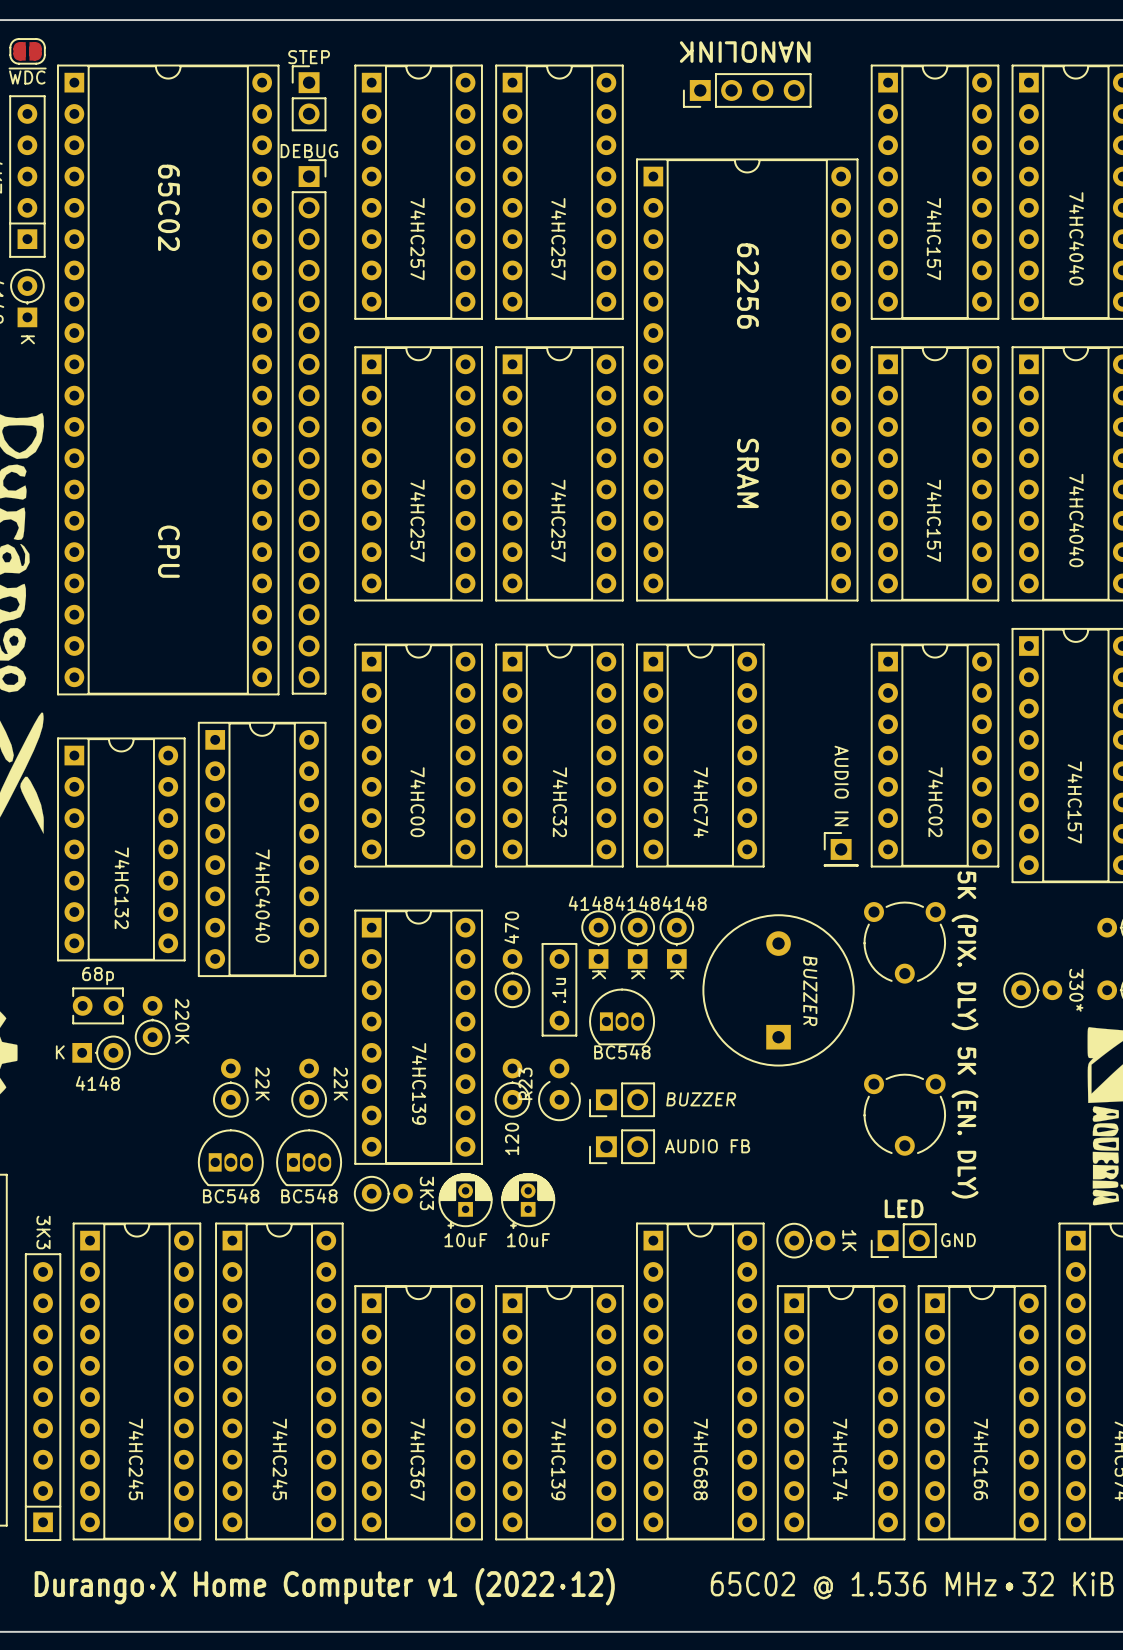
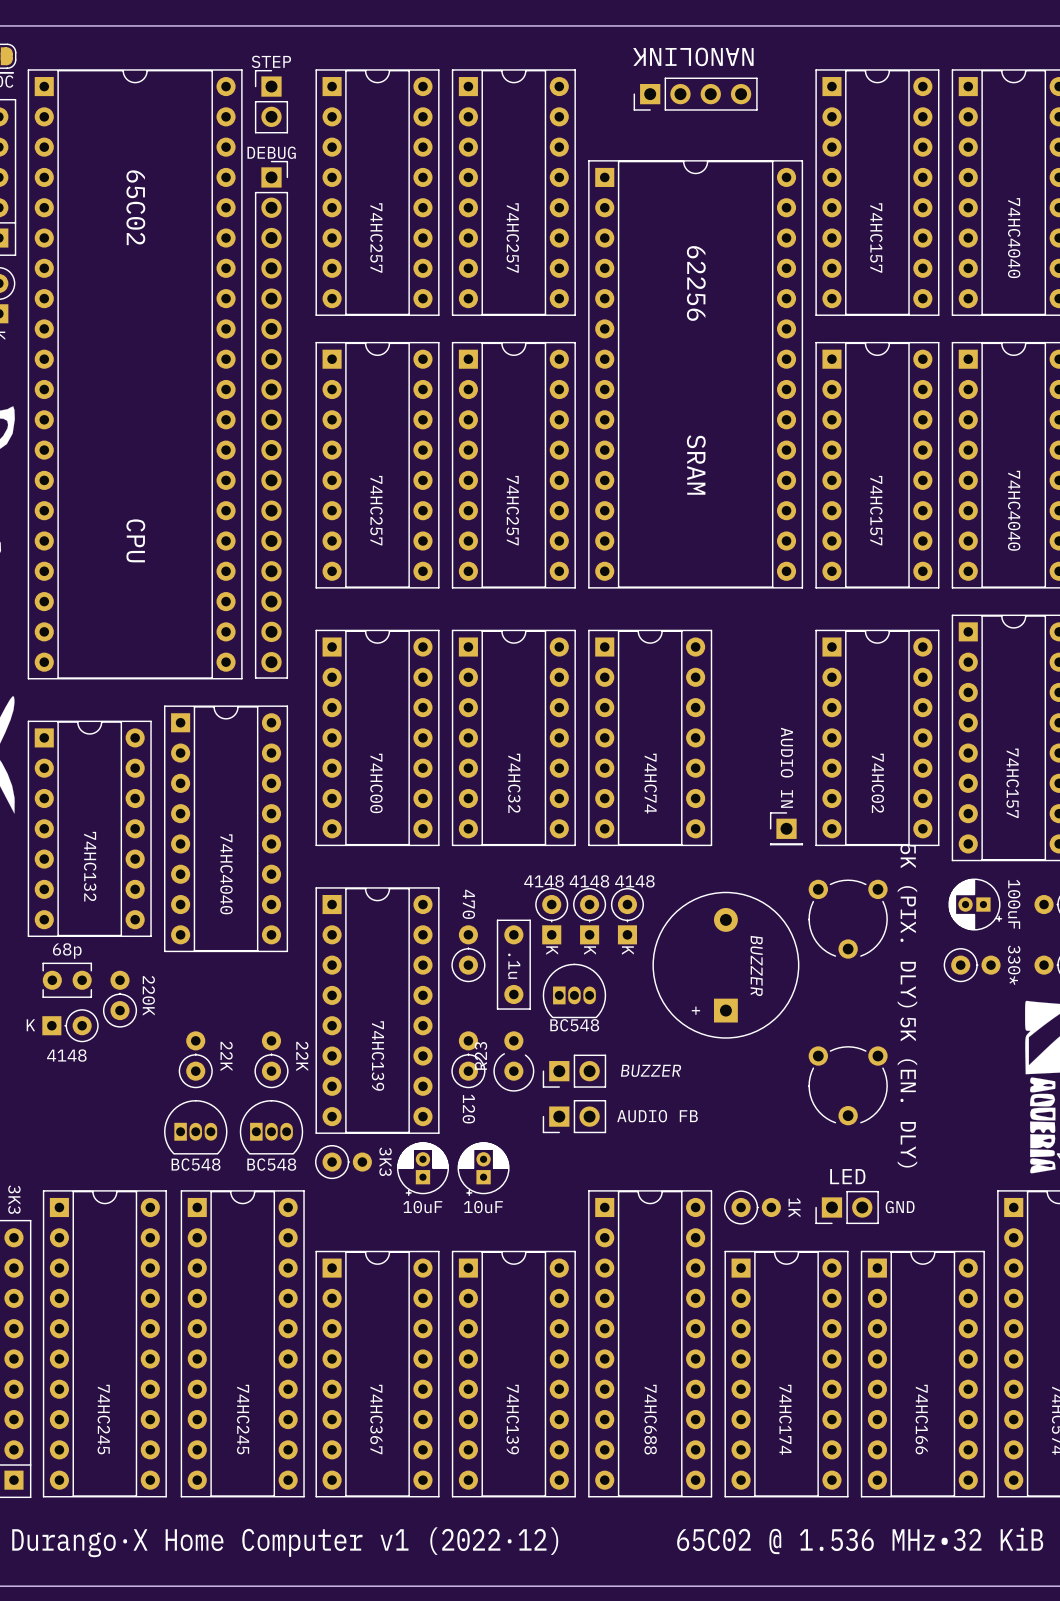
part value rotation: 0° (511, 927) -> 180° (468, 904)
part: none -> 100uF (975, 904)
part value rotation: 0° (559, 990) -> 180° (514, 966)
part text: none -> + (695, 1010)
part value rotation: 0° (512, 1138) -> 180° (468, 1109)

